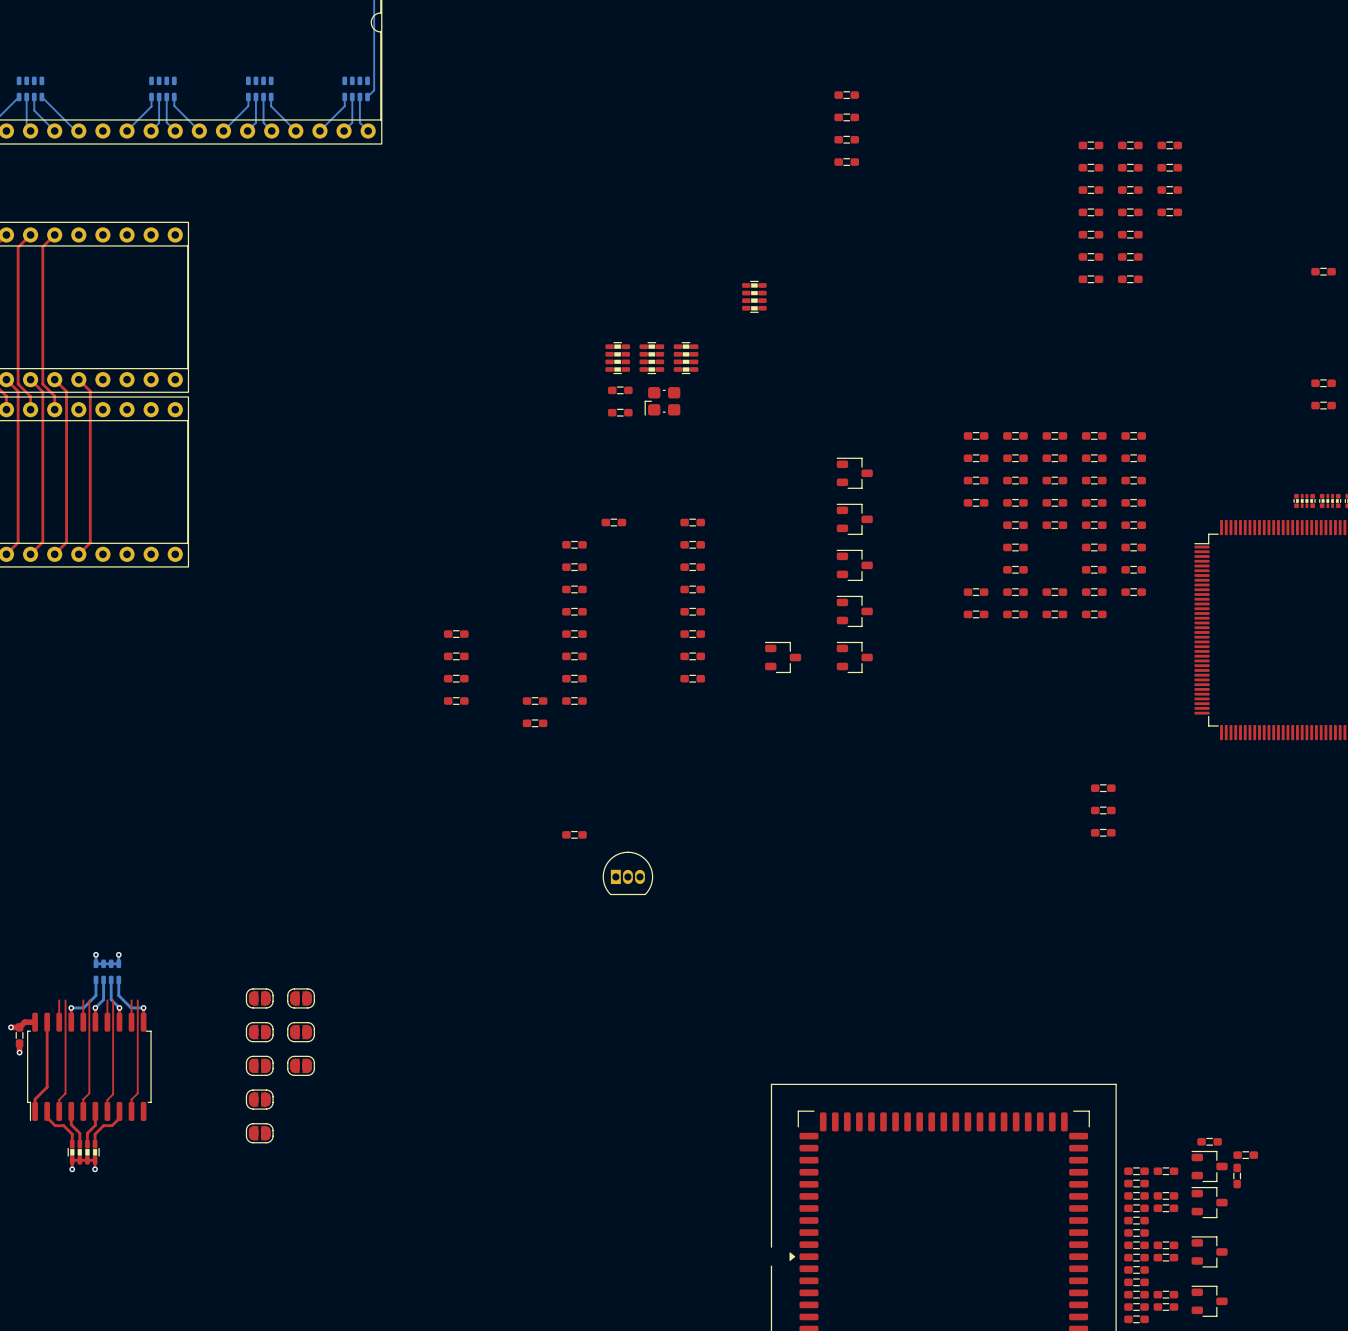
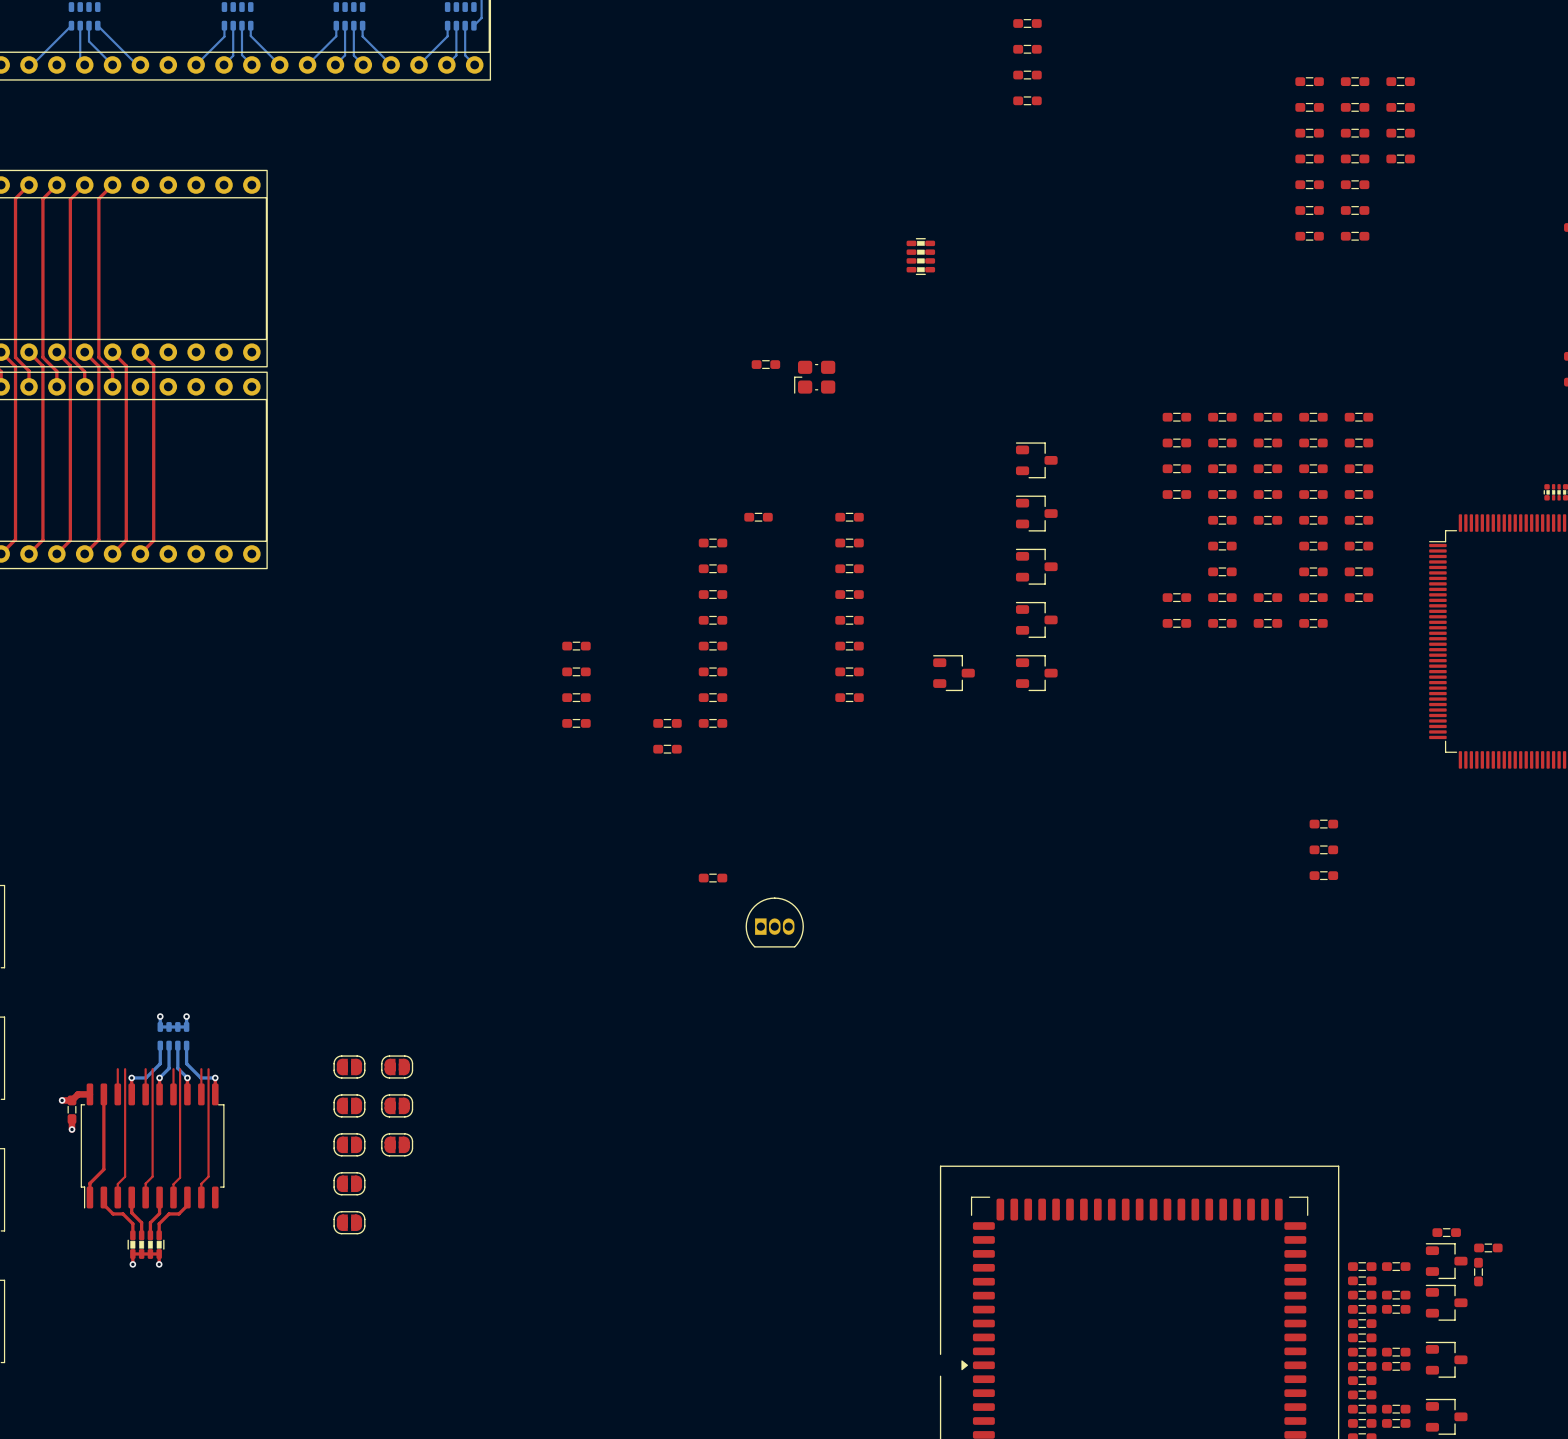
part: (617, 358) -> none
part: (651, 358) -> none
part: (686, 358) -> none
part: (620, 412) -> none

